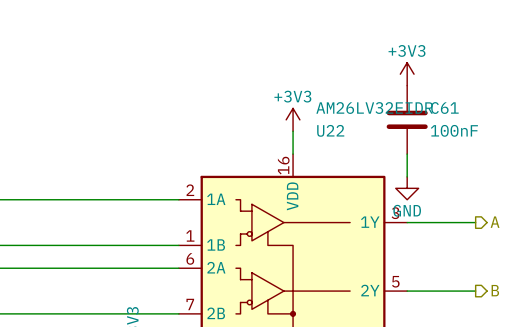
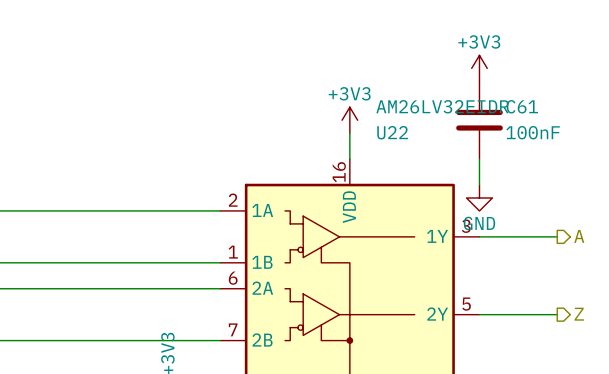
hierarchical label: B (495, 290) -> Z (579, 314)

